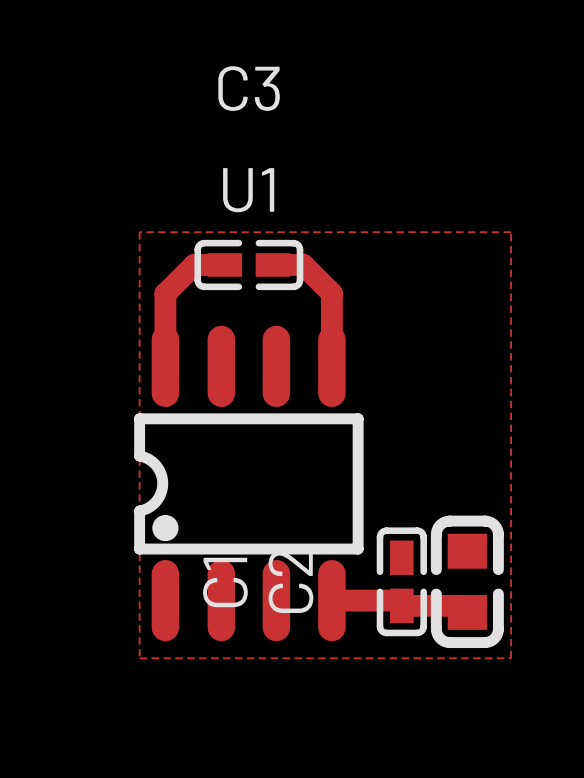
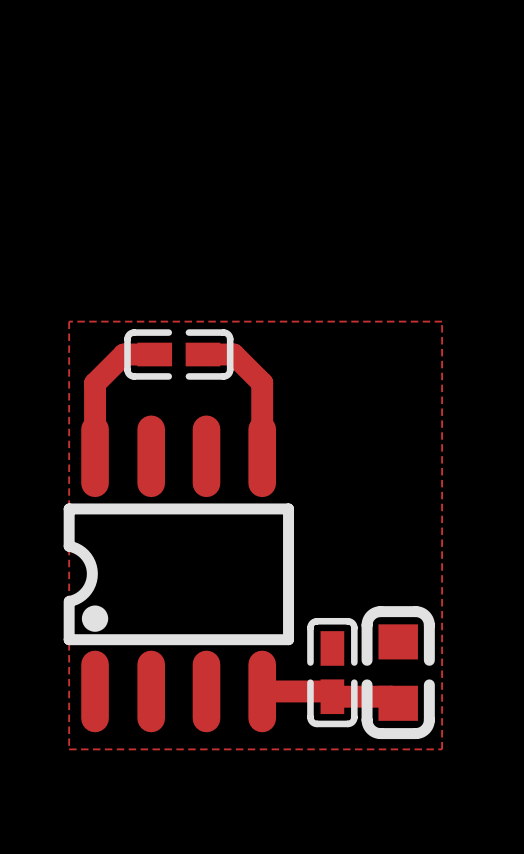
C3 name: C3 (249, 88) -> none
U1 name: U1 (248, 190) -> none
C2 name: C2 (290, 581) -> none
C1 name: C1 (225, 582) -> none

